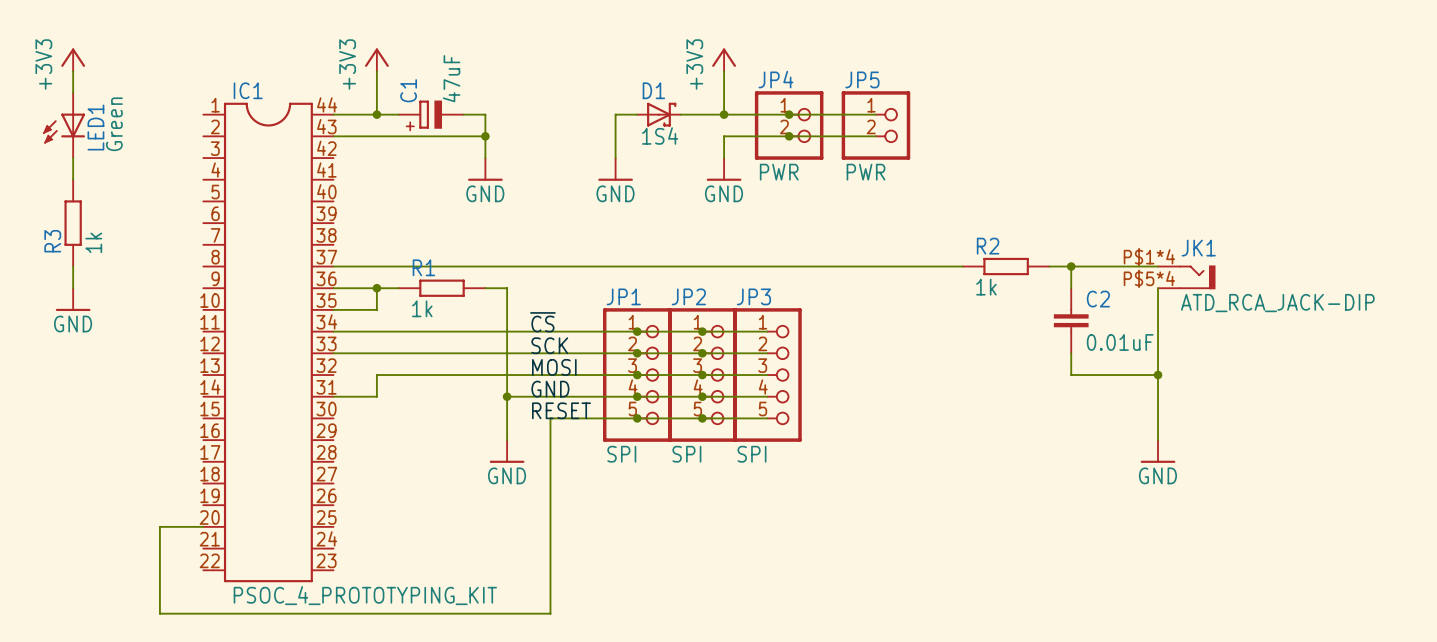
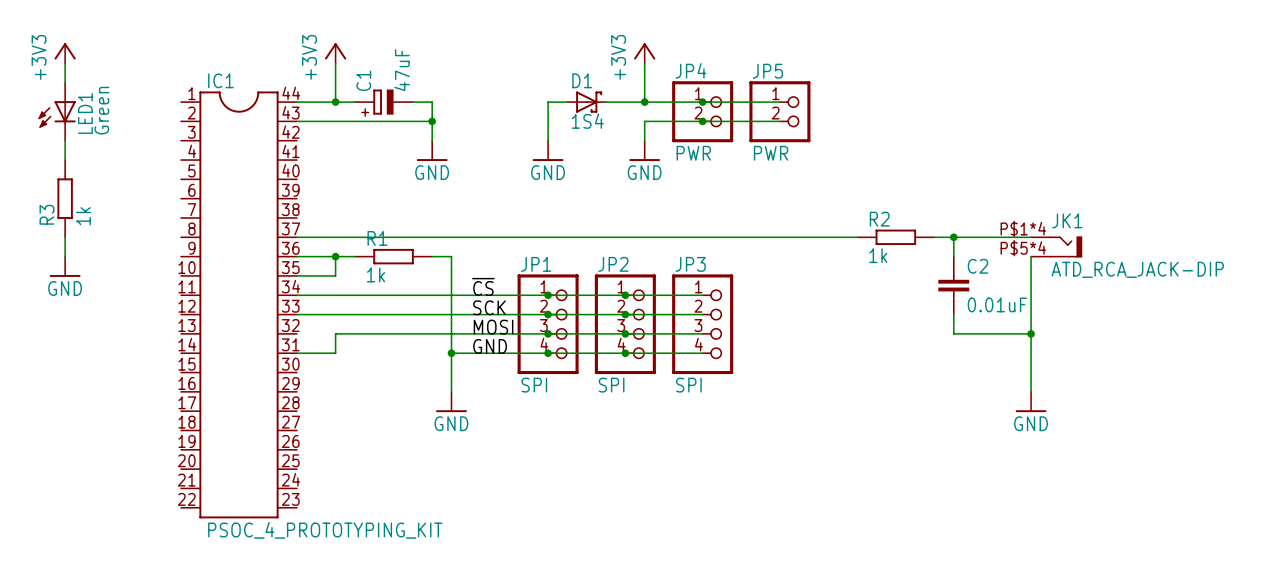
JP1 symbol: [602, 308, 672, 442] -> [517, 274, 579, 375]
JP2 symbol: [668, 308, 737, 442] -> [594, 274, 656, 375]
JP3 symbol: [733, 308, 802, 442] -> [672, 274, 734, 375]
junction: none -> (548, 295)
junction: (637, 331) -> none
junction: none -> (548, 314)
junction: (637, 353) -> none
junction: none -> (548, 333)
junction: (637, 375) -> none
junction: none -> (548, 353)
junction: (637, 396) -> none
label: RESET (561, 410) -> none
junction: (637, 418) -> none
junction: (702, 418) -> none
wire: (767, 418) (550, 418) (550, 613) (159, 613) (159, 526) (203, 526) -> none

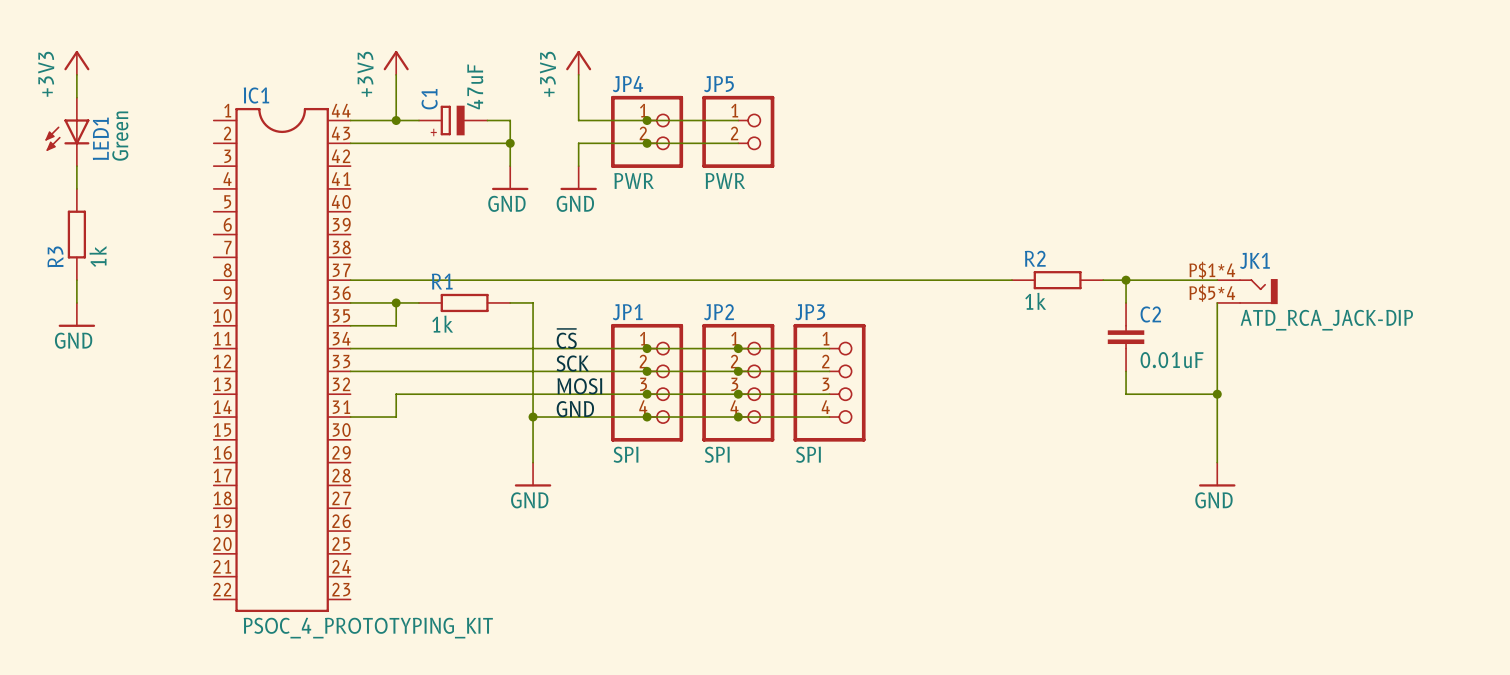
power symbol position: +3V3 (644, 53) -> +3V3 (578, 62)
wire: (644, 63) (644, 102) -> none
wire: (548, 102) (548, 140) -> (647, 120) (578, 120) (578, 74)
junction: none -> (647, 120)
D1: 1S4 (586, 102) -> none
wire: (625, 102) (779, 102) -> none
junction: (644, 102) -> none
junction: (702, 102) -> none
JP4 position: (702, 111) -> (647, 131)
JP5 position: (779, 111) -> (738, 131)
junction: none -> (647, 143)
junction: (702, 121) -> none
wire: (779, 121) (644, 121) (644, 140) -> (738, 143) (578, 143) (578, 166)
power symbol position: GND (548, 150) -> GND (578, 178)
power symbol: GND (644, 150) -> none

